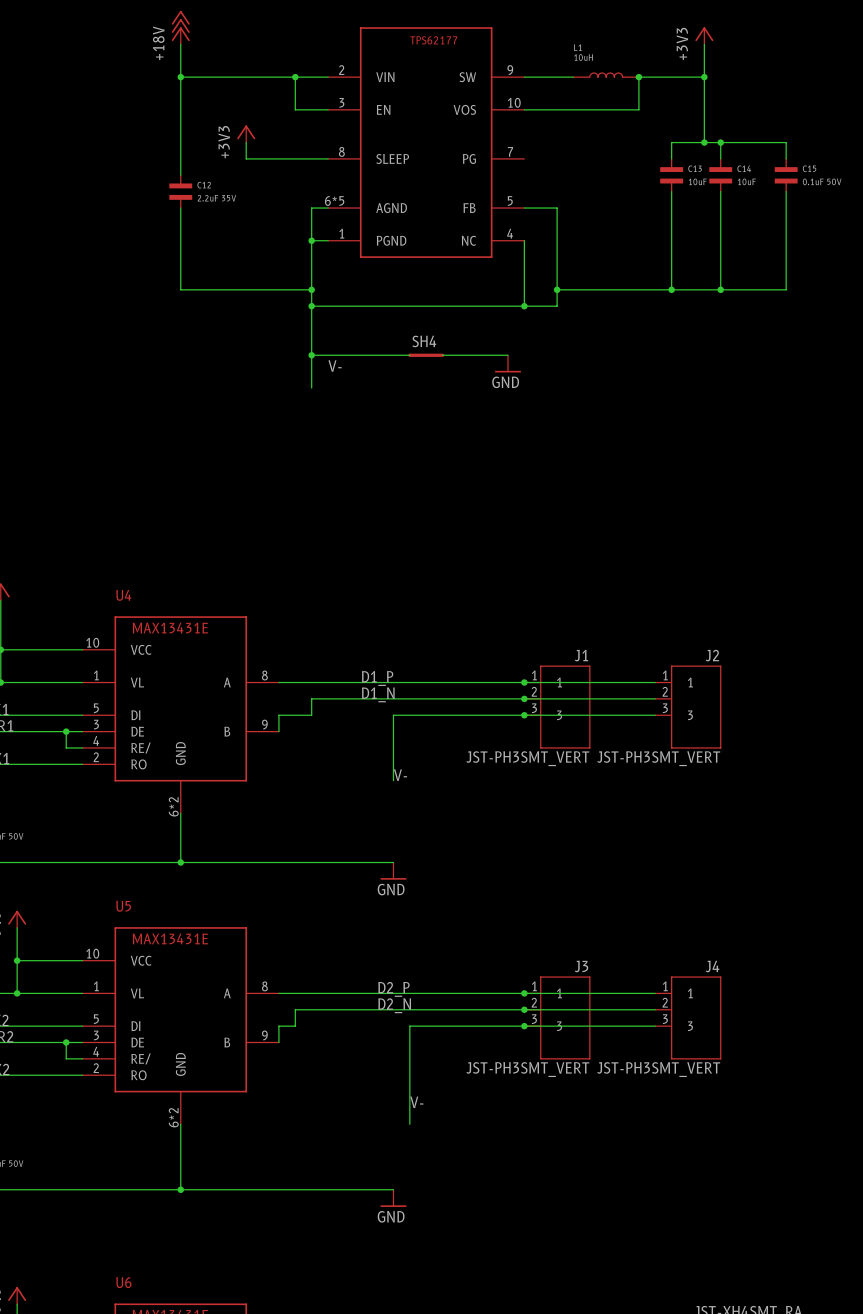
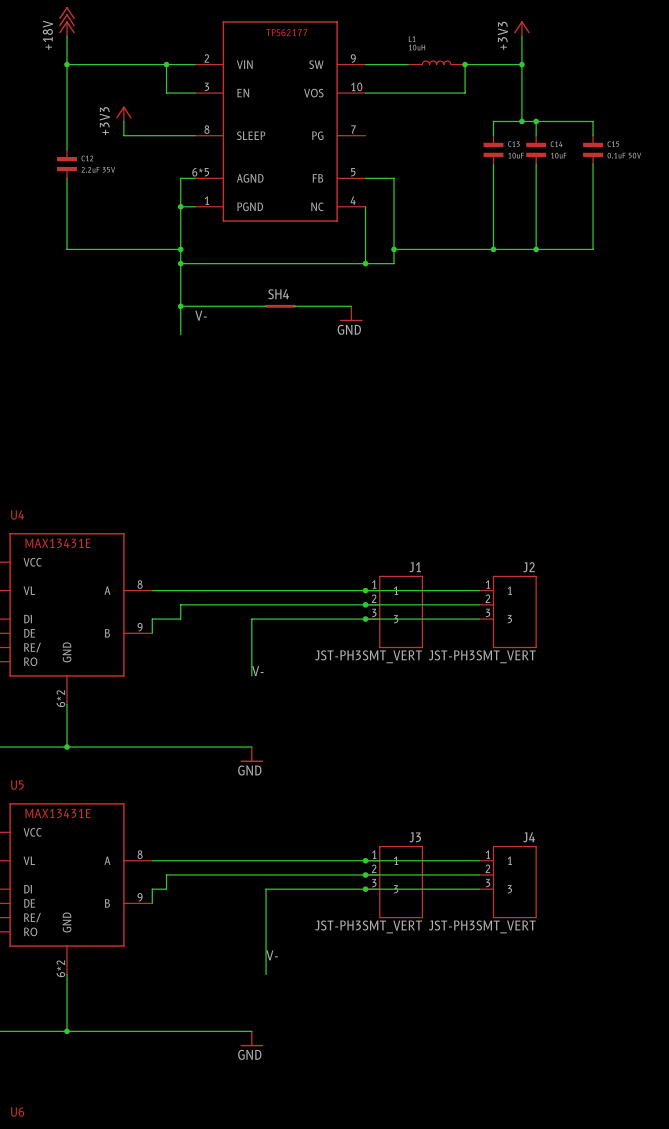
label: D1_P (377, 678) -> none
label: D1_N (378, 694) -> none
label: D2_P (393, 989) -> none
label: D2_N (394, 1005) -> none

